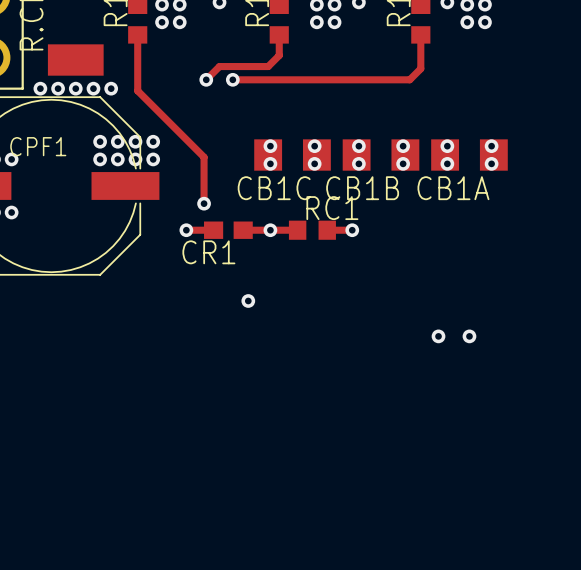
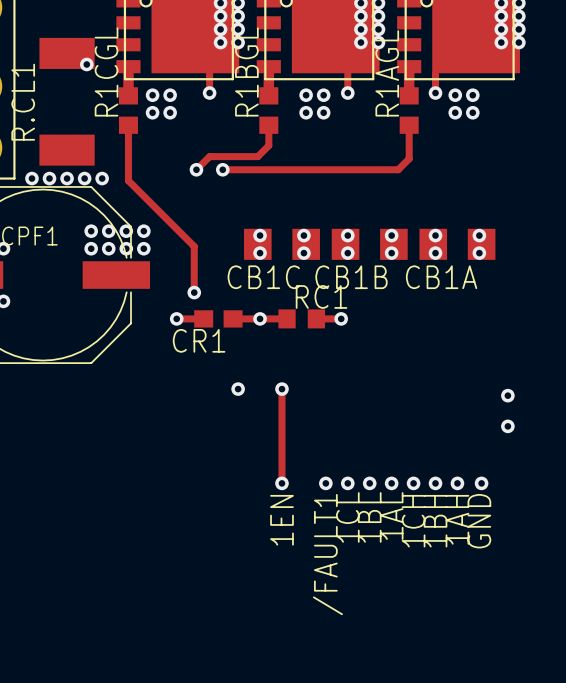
track: none -> (281, 389) (281, 483)
via: none -> (281, 389)
via: none -> (507, 395)
via: (438, 336) -> none
via: (469, 336) -> none
via: none -> (507, 426)
via: none -> (281, 483)
via: none -> (325, 483)
via: none -> (347, 483)
via: none -> (369, 483)
via: none -> (391, 483)
via: none -> (413, 483)
via: none -> (435, 483)
via: none -> (457, 483)
via: none -> (481, 483)
text: none -> 1AL (391, 516)
text: none -> 1CL (347, 517)
text: none -> 1BL (369, 517)
text: none -> 1AH (457, 519)
text: none -> 1EN (281, 520)
text: none -> 1CH (413, 521)
text: none -> 1BH (435, 521)
text: none -> GND (479, 521)
text: none -> /FAULT1 (327, 554)

